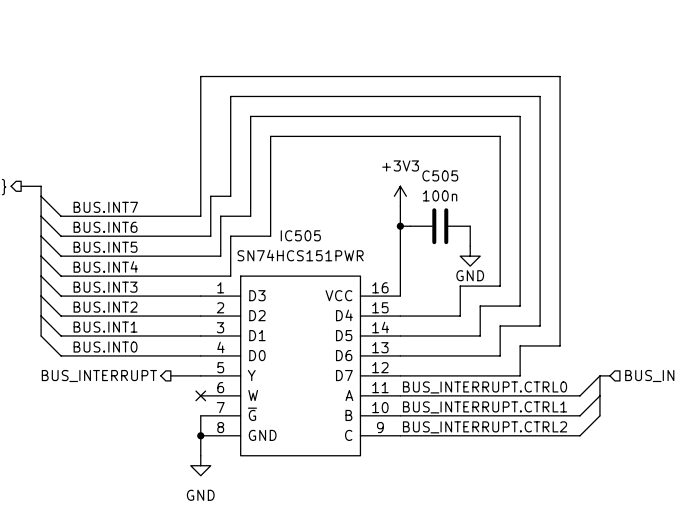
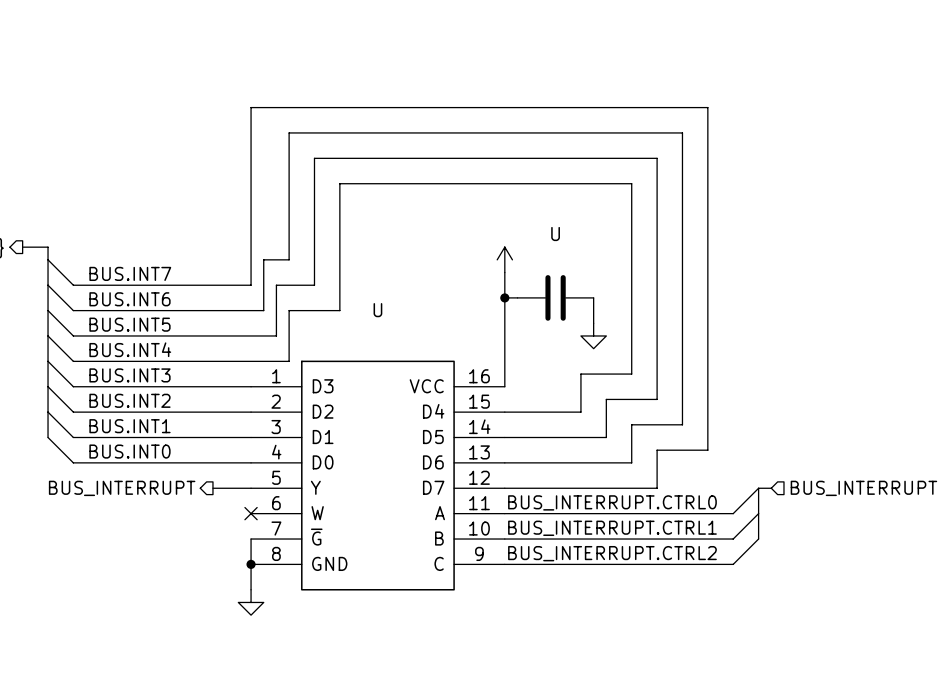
power symbol text: +3V3 (400, 165) -> none
C505 name: C505 (440, 175) -> U (555, 234)
C505 value: 100n (440, 195) -> none
IC505 name: IC505 (300, 235) -> U (377, 310)
IC505 value: SN74HCS151PWR (300, 255) -> none
power symbol text: GND (470, 275) -> none
power symbol text: GND (200, 495) -> none

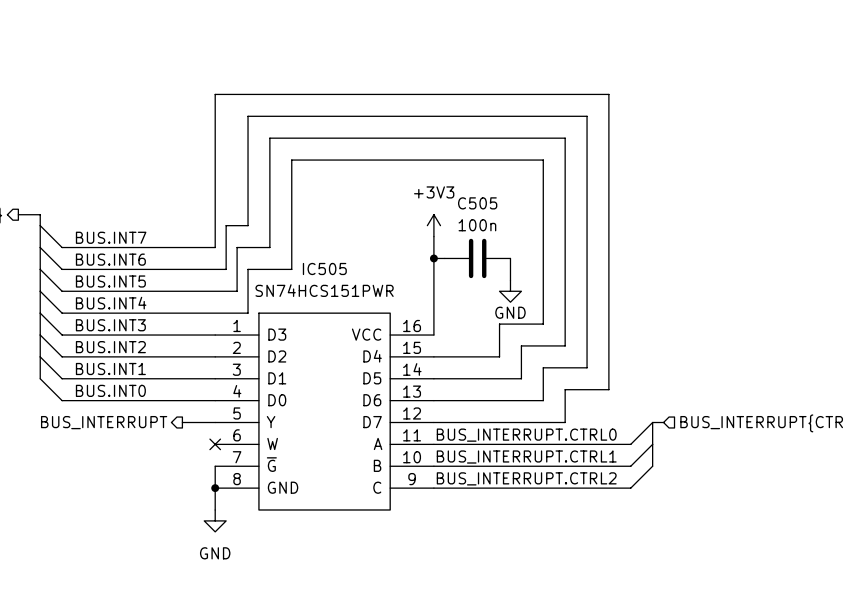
power symbol text: none -> +3V3 (434, 192)
U name: U (555, 234) -> C505 (477, 203)
U value: none -> 100n (477, 225)
U name: U (377, 310) -> IC505 (324, 268)
U value: none -> SN74HCS151PWR (324, 290)
power symbol text: none -> GND (510, 312)
power symbol text: none -> GND (215, 553)

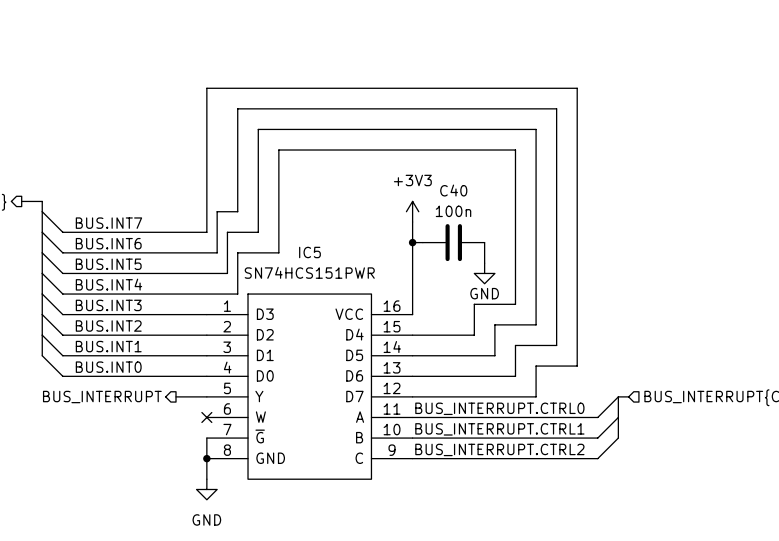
C505 name: C505 (477, 203) -> C40 (453, 190)
IC505 name: IC505 (324, 268) -> IC5 (309, 252)

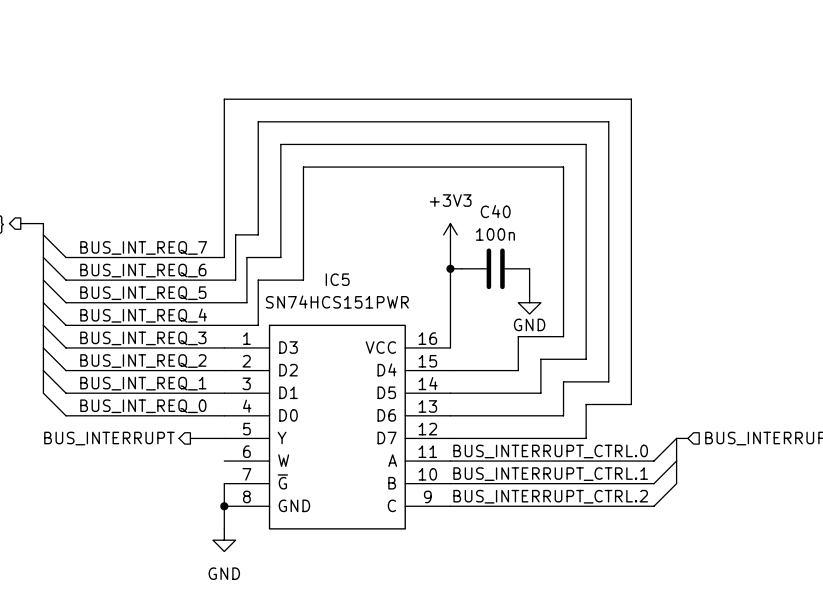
label: BUS.INT7 (108, 223) -> BUS_INT_REQ_7 (143, 247)
label: BUS.INT6 (108, 243) -> BUS_INT_REQ_6 (143, 270)
label: BUS.INT5 (108, 264) -> BUS_INT_REQ_5 (143, 293)
label: BUS.INT4 (108, 284) -> BUS_INT_REQ_4 (143, 315)
label: BUS.INT3 (108, 305) -> BUS_INT_REQ_3 (143, 338)
label: BUS.INT2 (108, 326) -> BUS_INT_REQ_2 (143, 361)
label: BUS.INT1 (108, 346) -> BUS_INT_REQ_1 (143, 383)
label: BUS.INT0 (108, 367) -> BUS_INT_REQ_0 (143, 406)
label: BUS_INTERRUPT.CTRL0 (499, 408) -> BUS_INTERRUPT_CTRL.0 (550, 451)
no-connect mark: (206, 417) -> none
label: BUS_INTERRUPT.CTRL1 (499, 429) -> BUS_INTERRUPT_CTRL.1 (550, 474)
label: BUS_INTERRUPT.CTRL2 (499, 449) -> BUS_INTERRUPT_CTRL.2 (550, 496)

